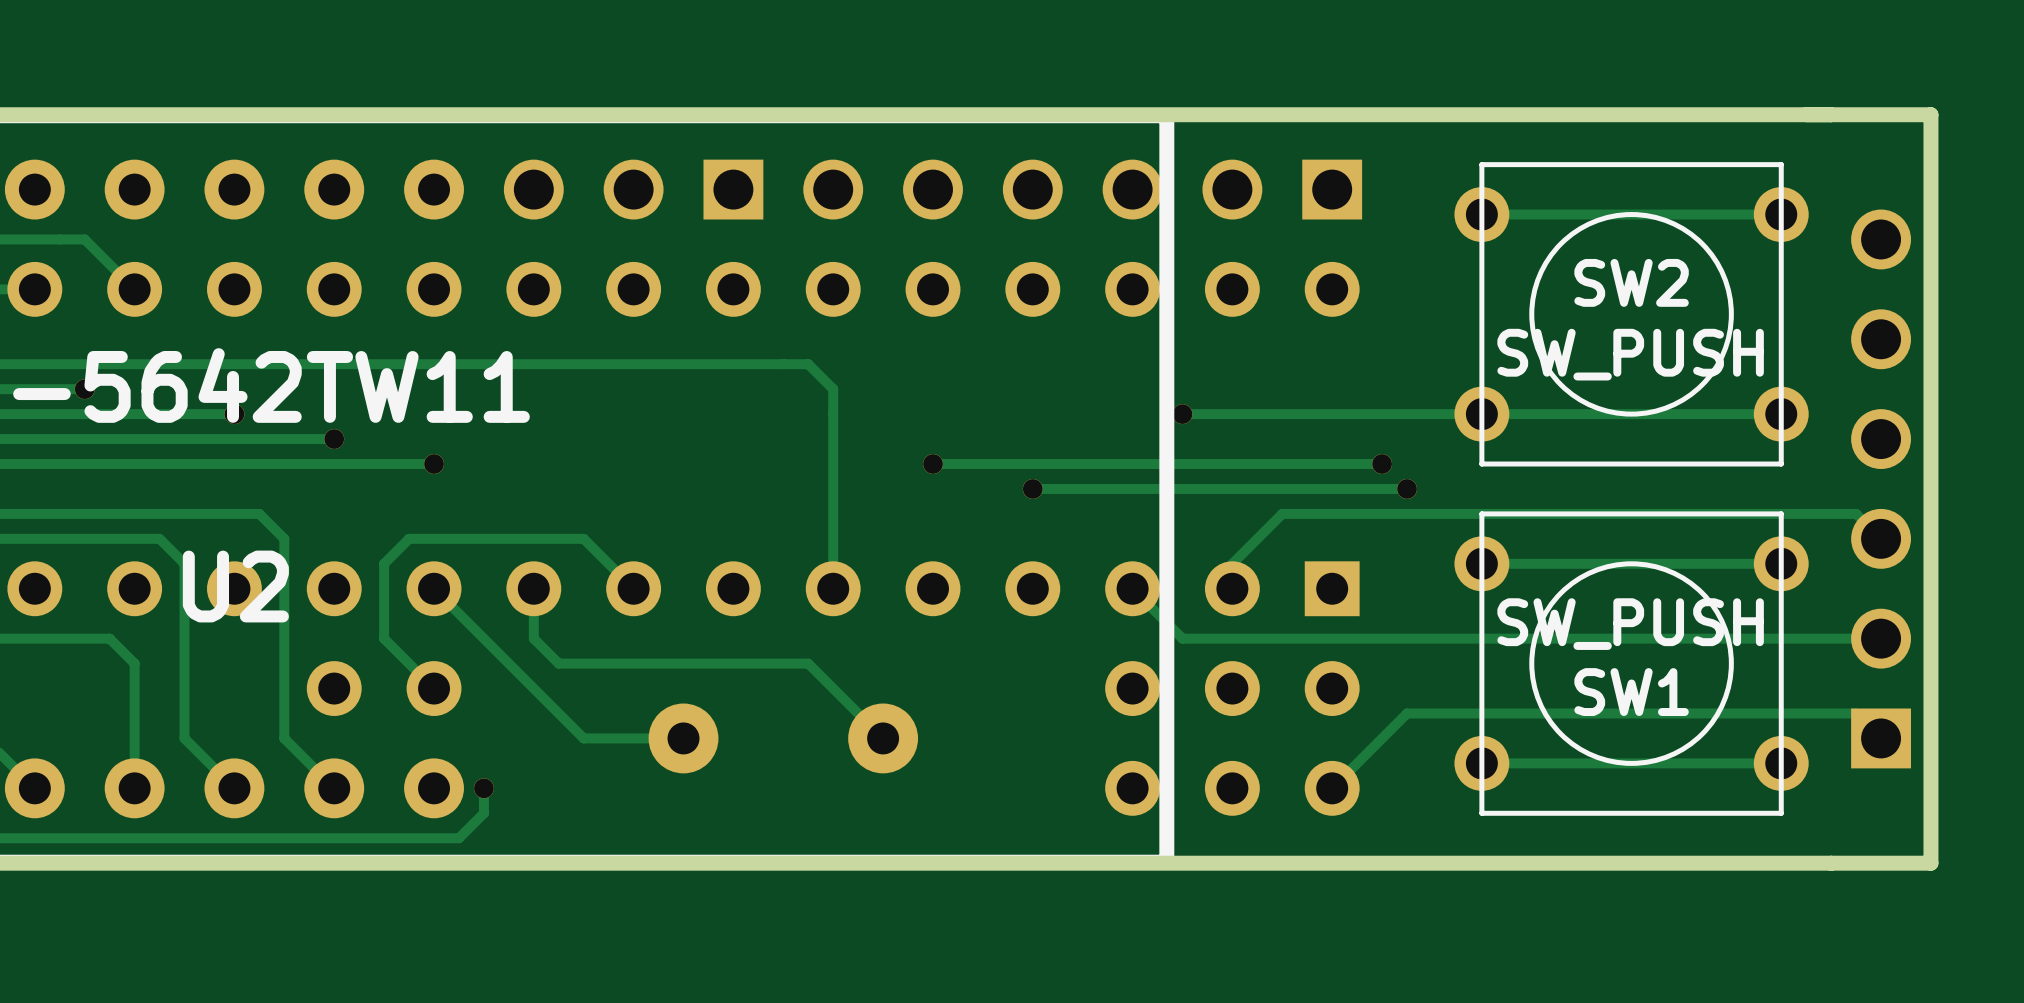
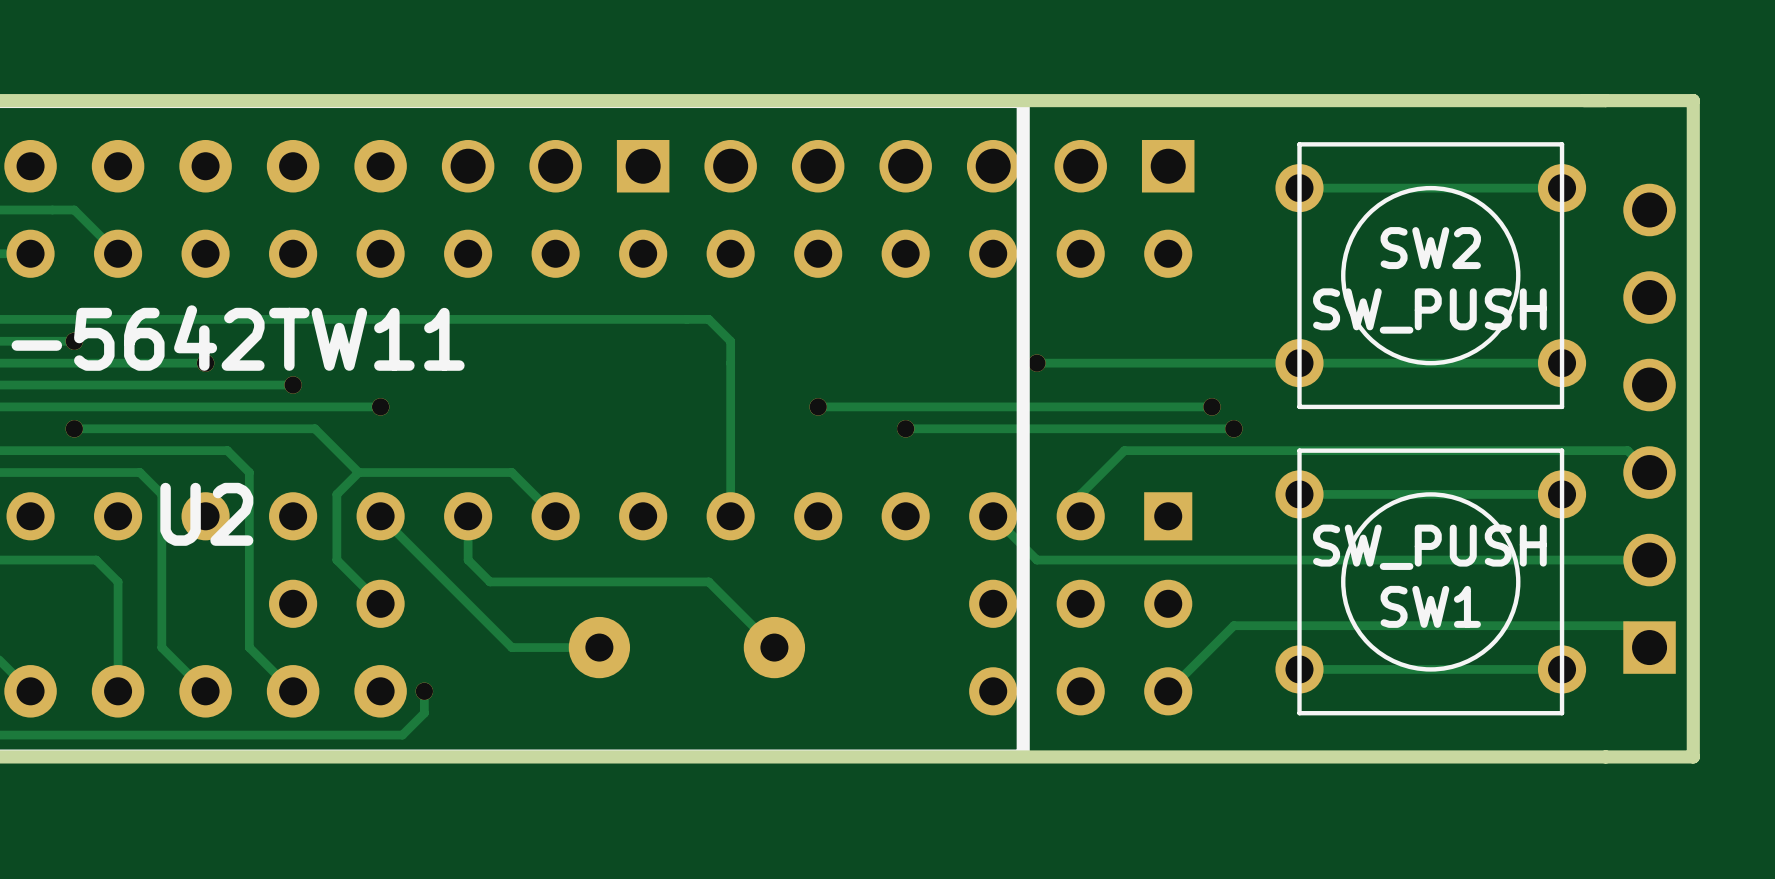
track: none -> (74, 428) (314, 428) (358, 472)
via: none -> (74, 428)

